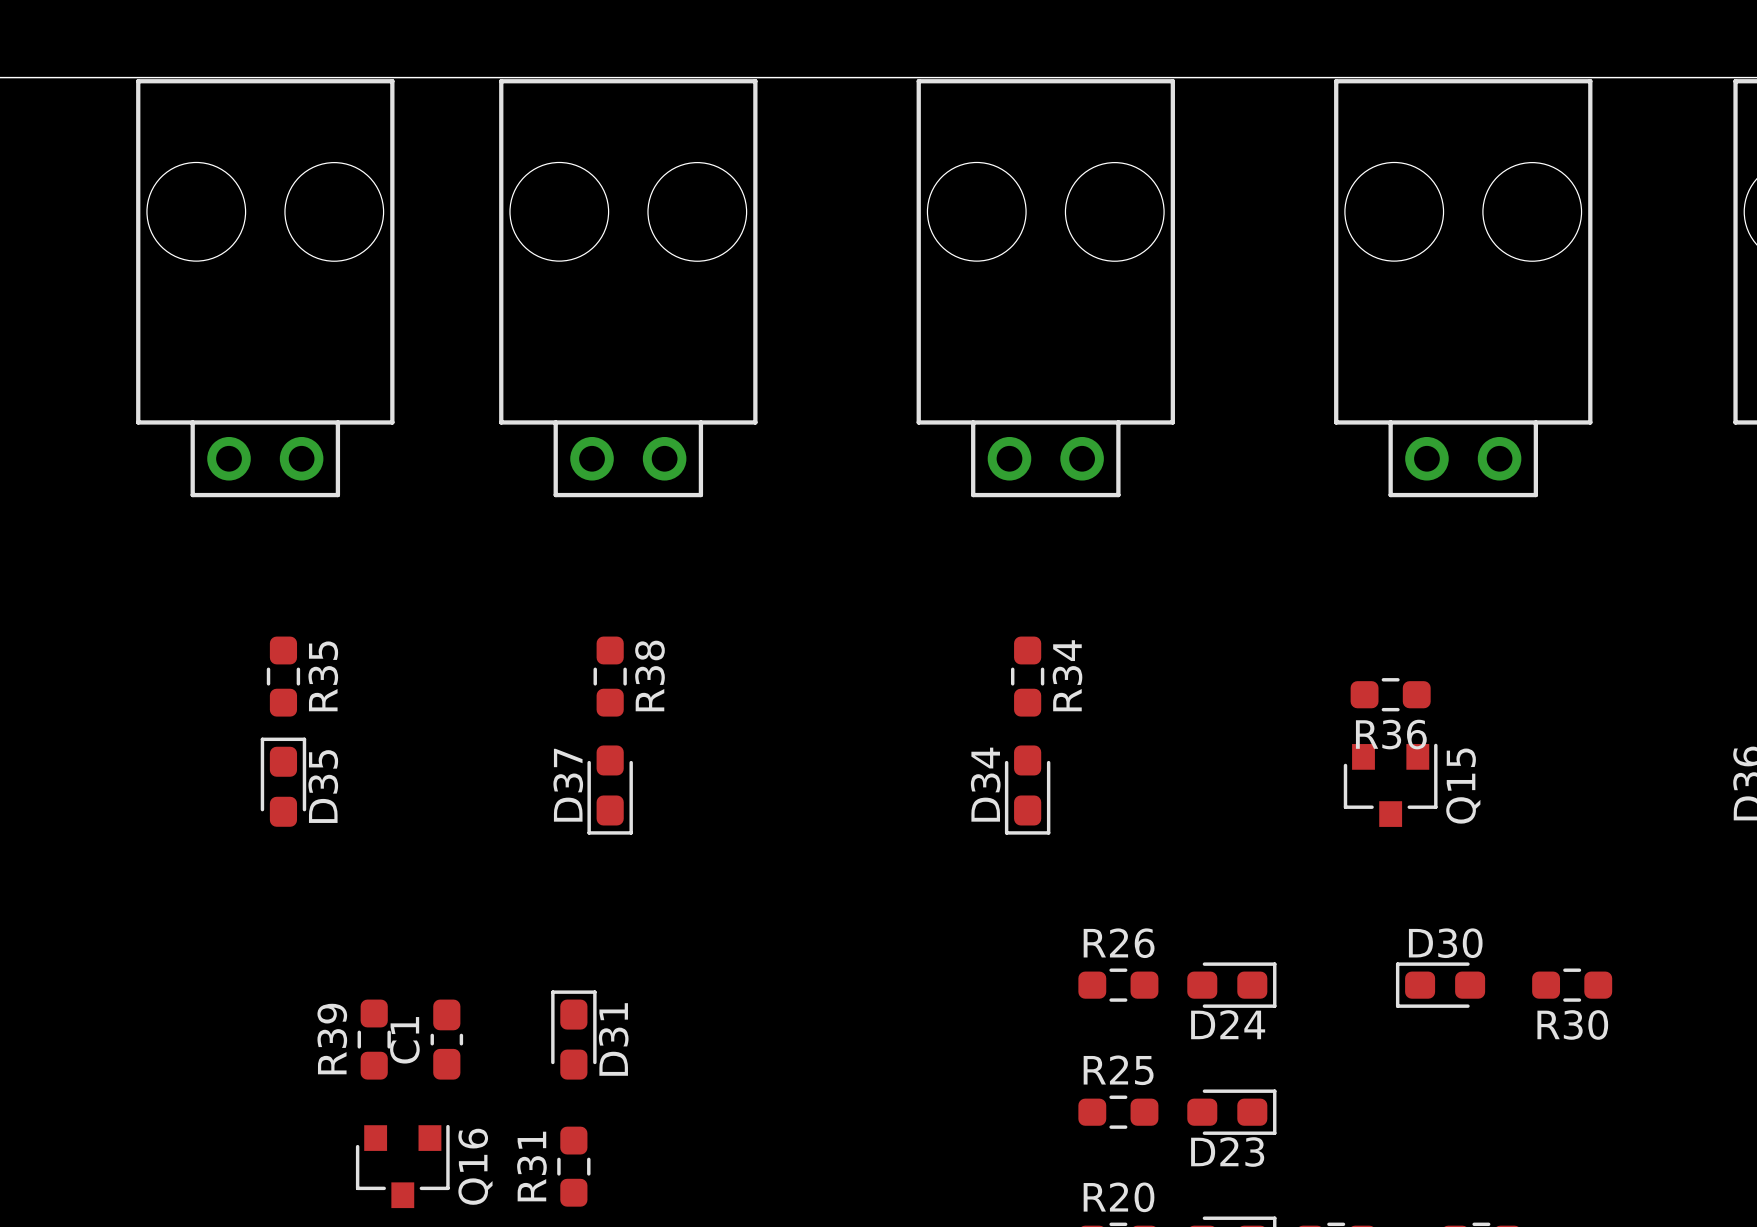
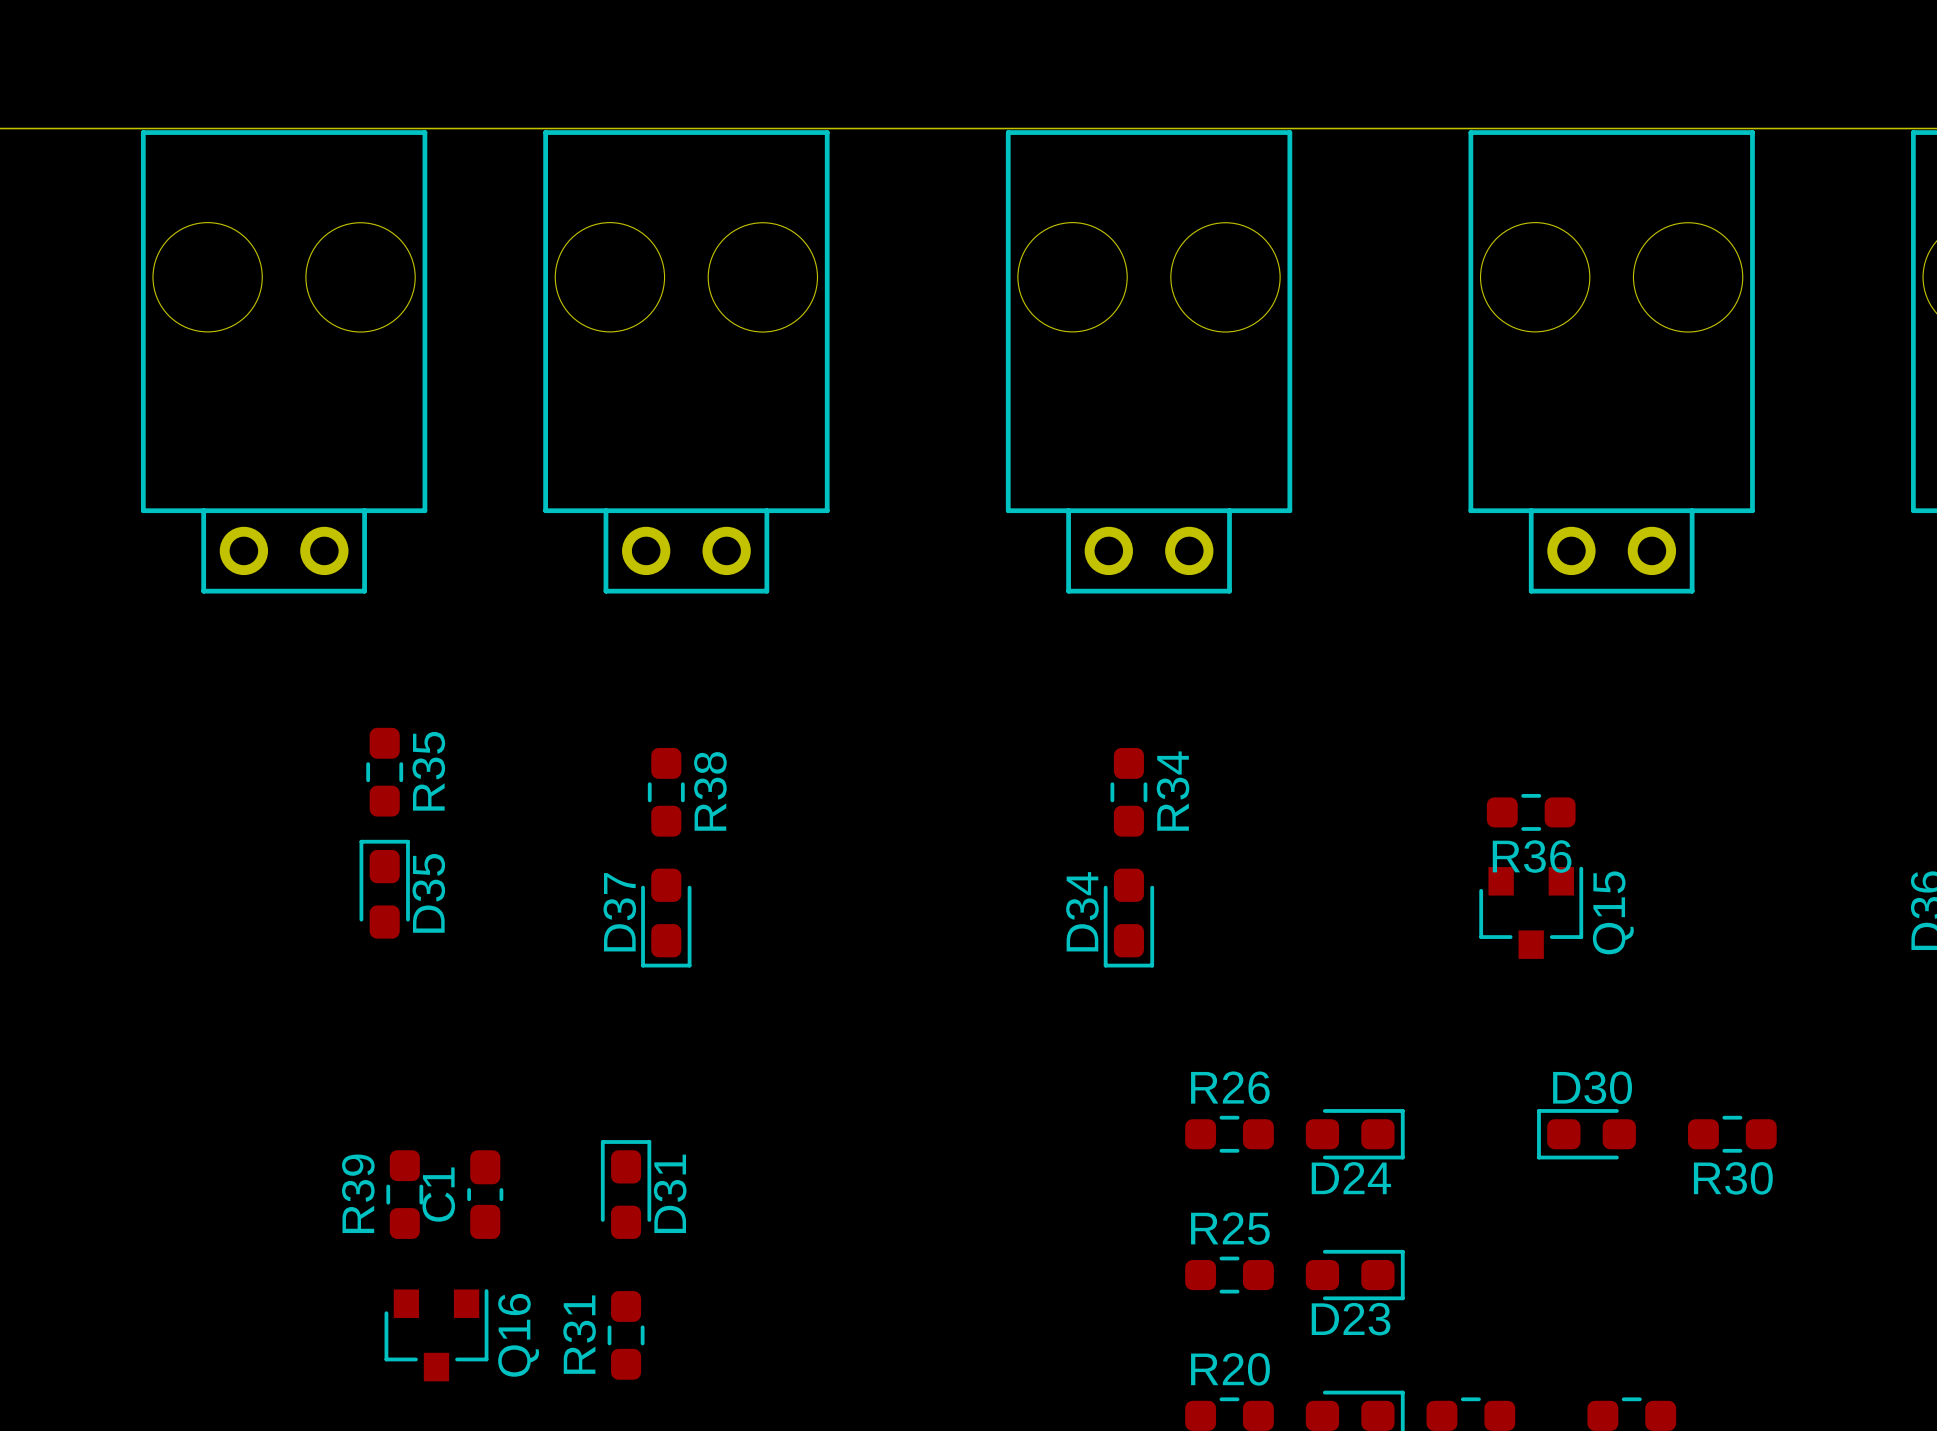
R35 position: (283, 676) -> (384, 772)
D35 position: (283, 782) -> (384, 889)

